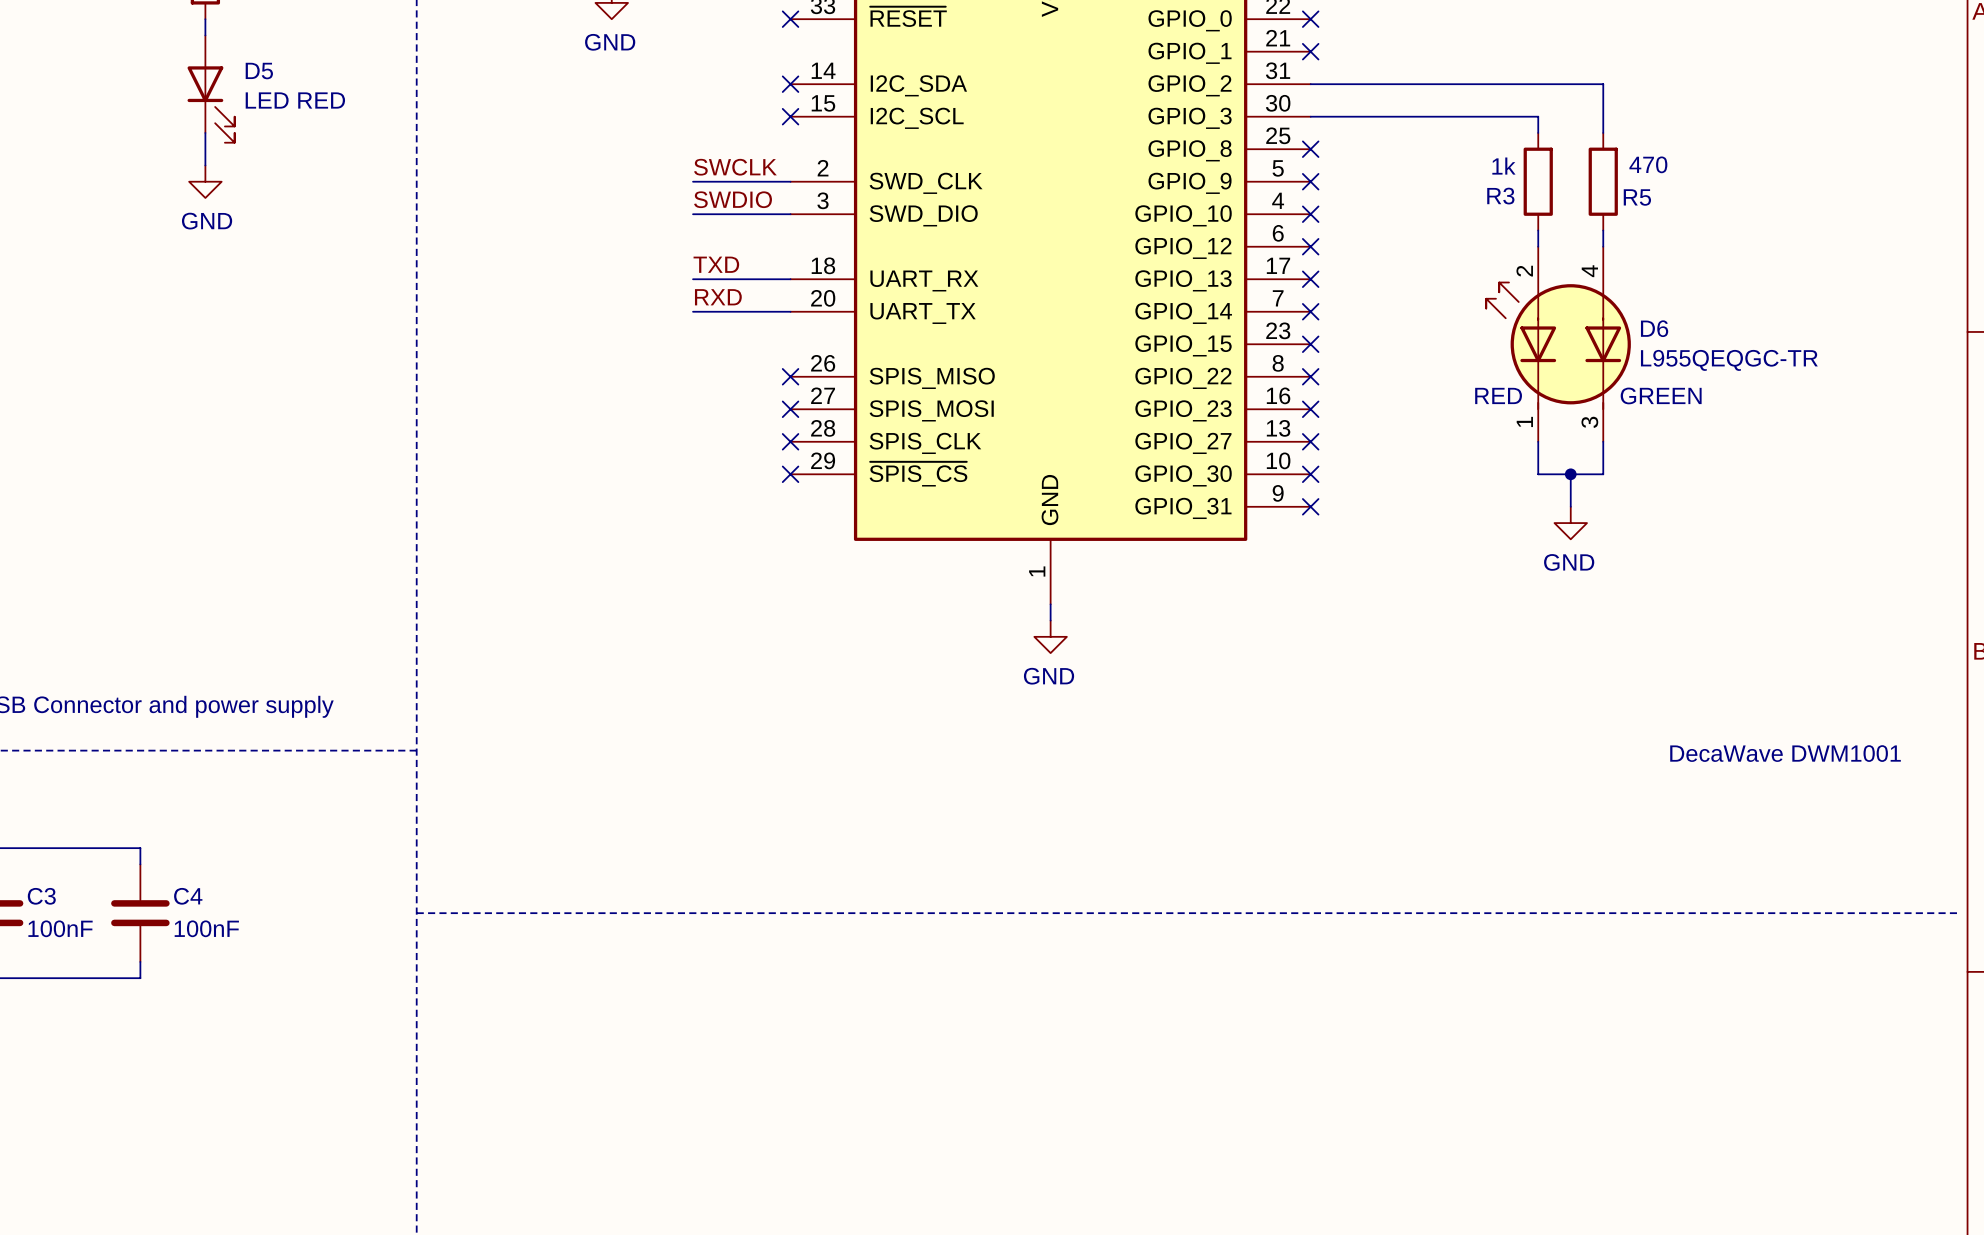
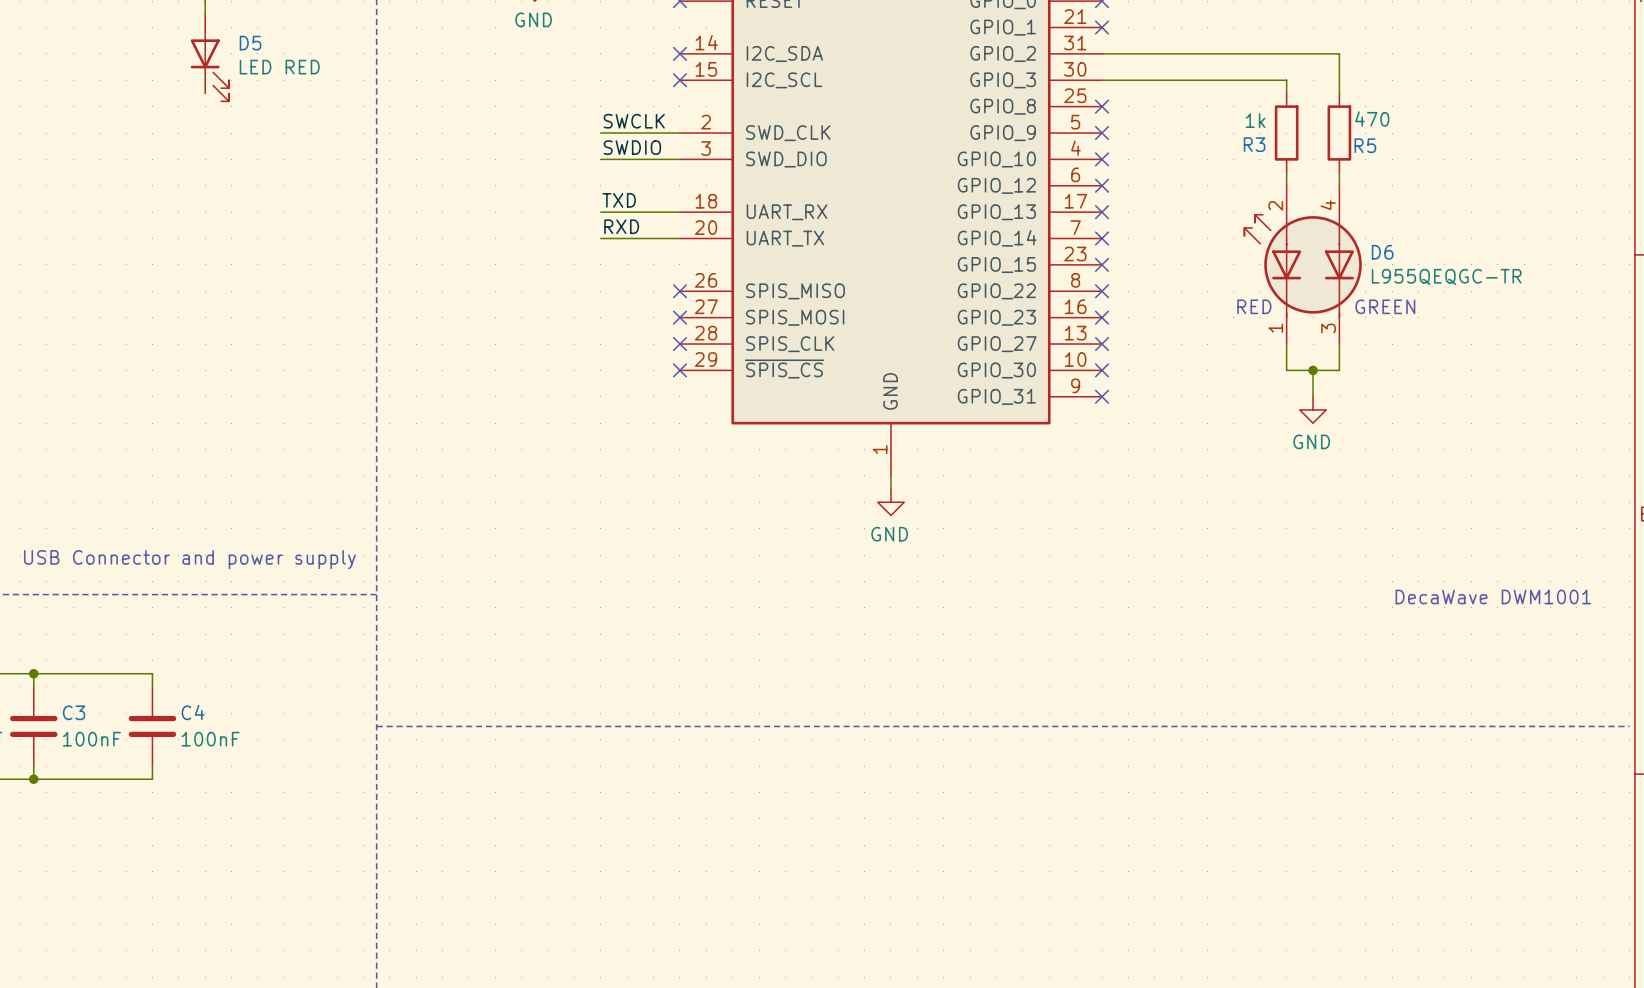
wire: (205, 132) (205, 165) -> none
power symbol: GND (205, 181) -> none

